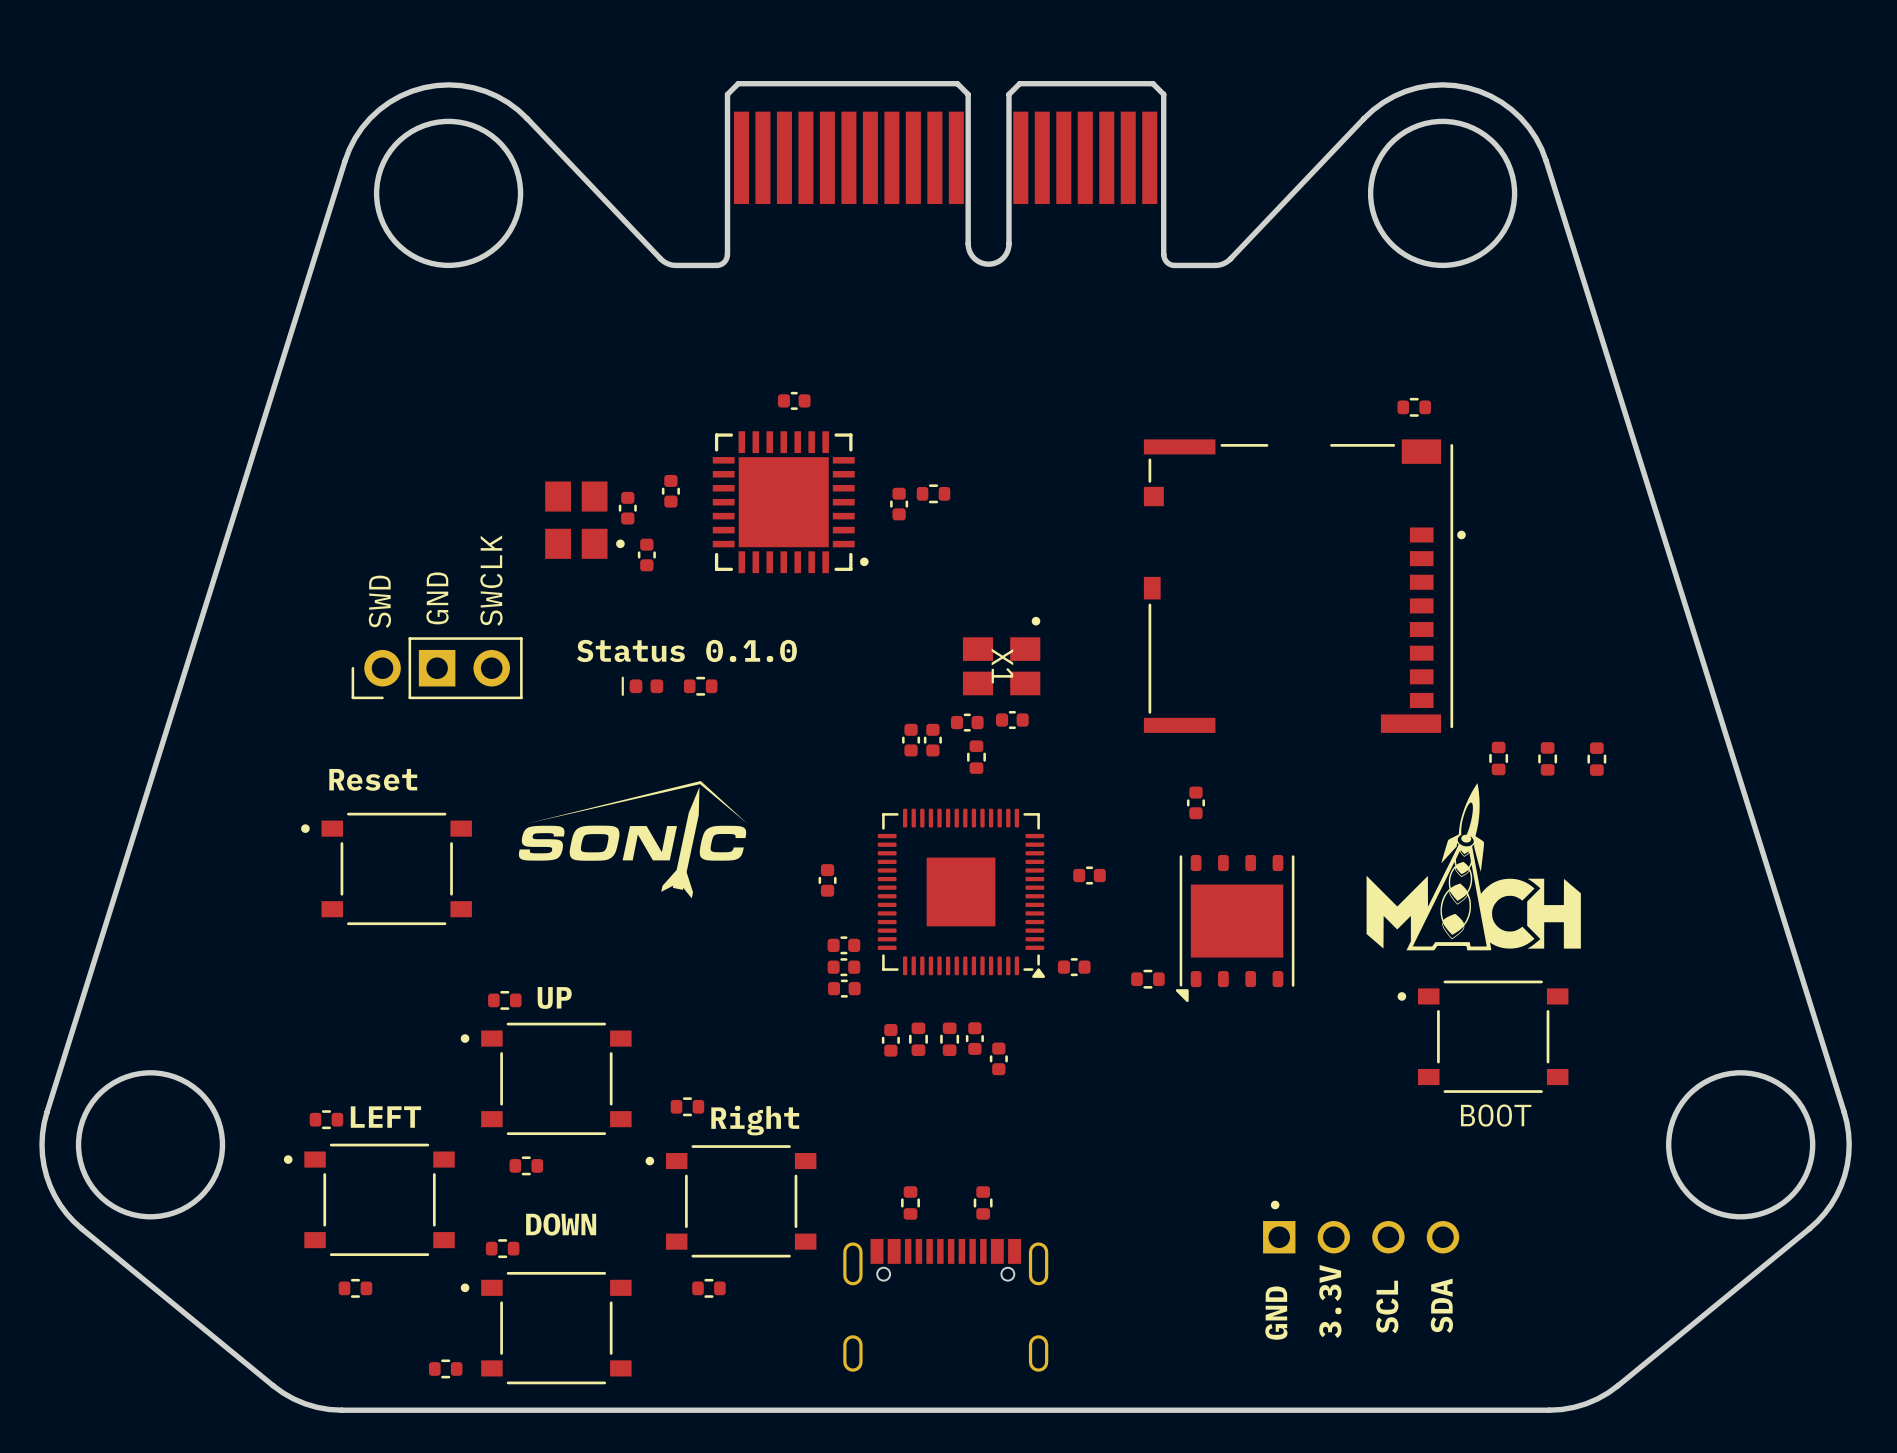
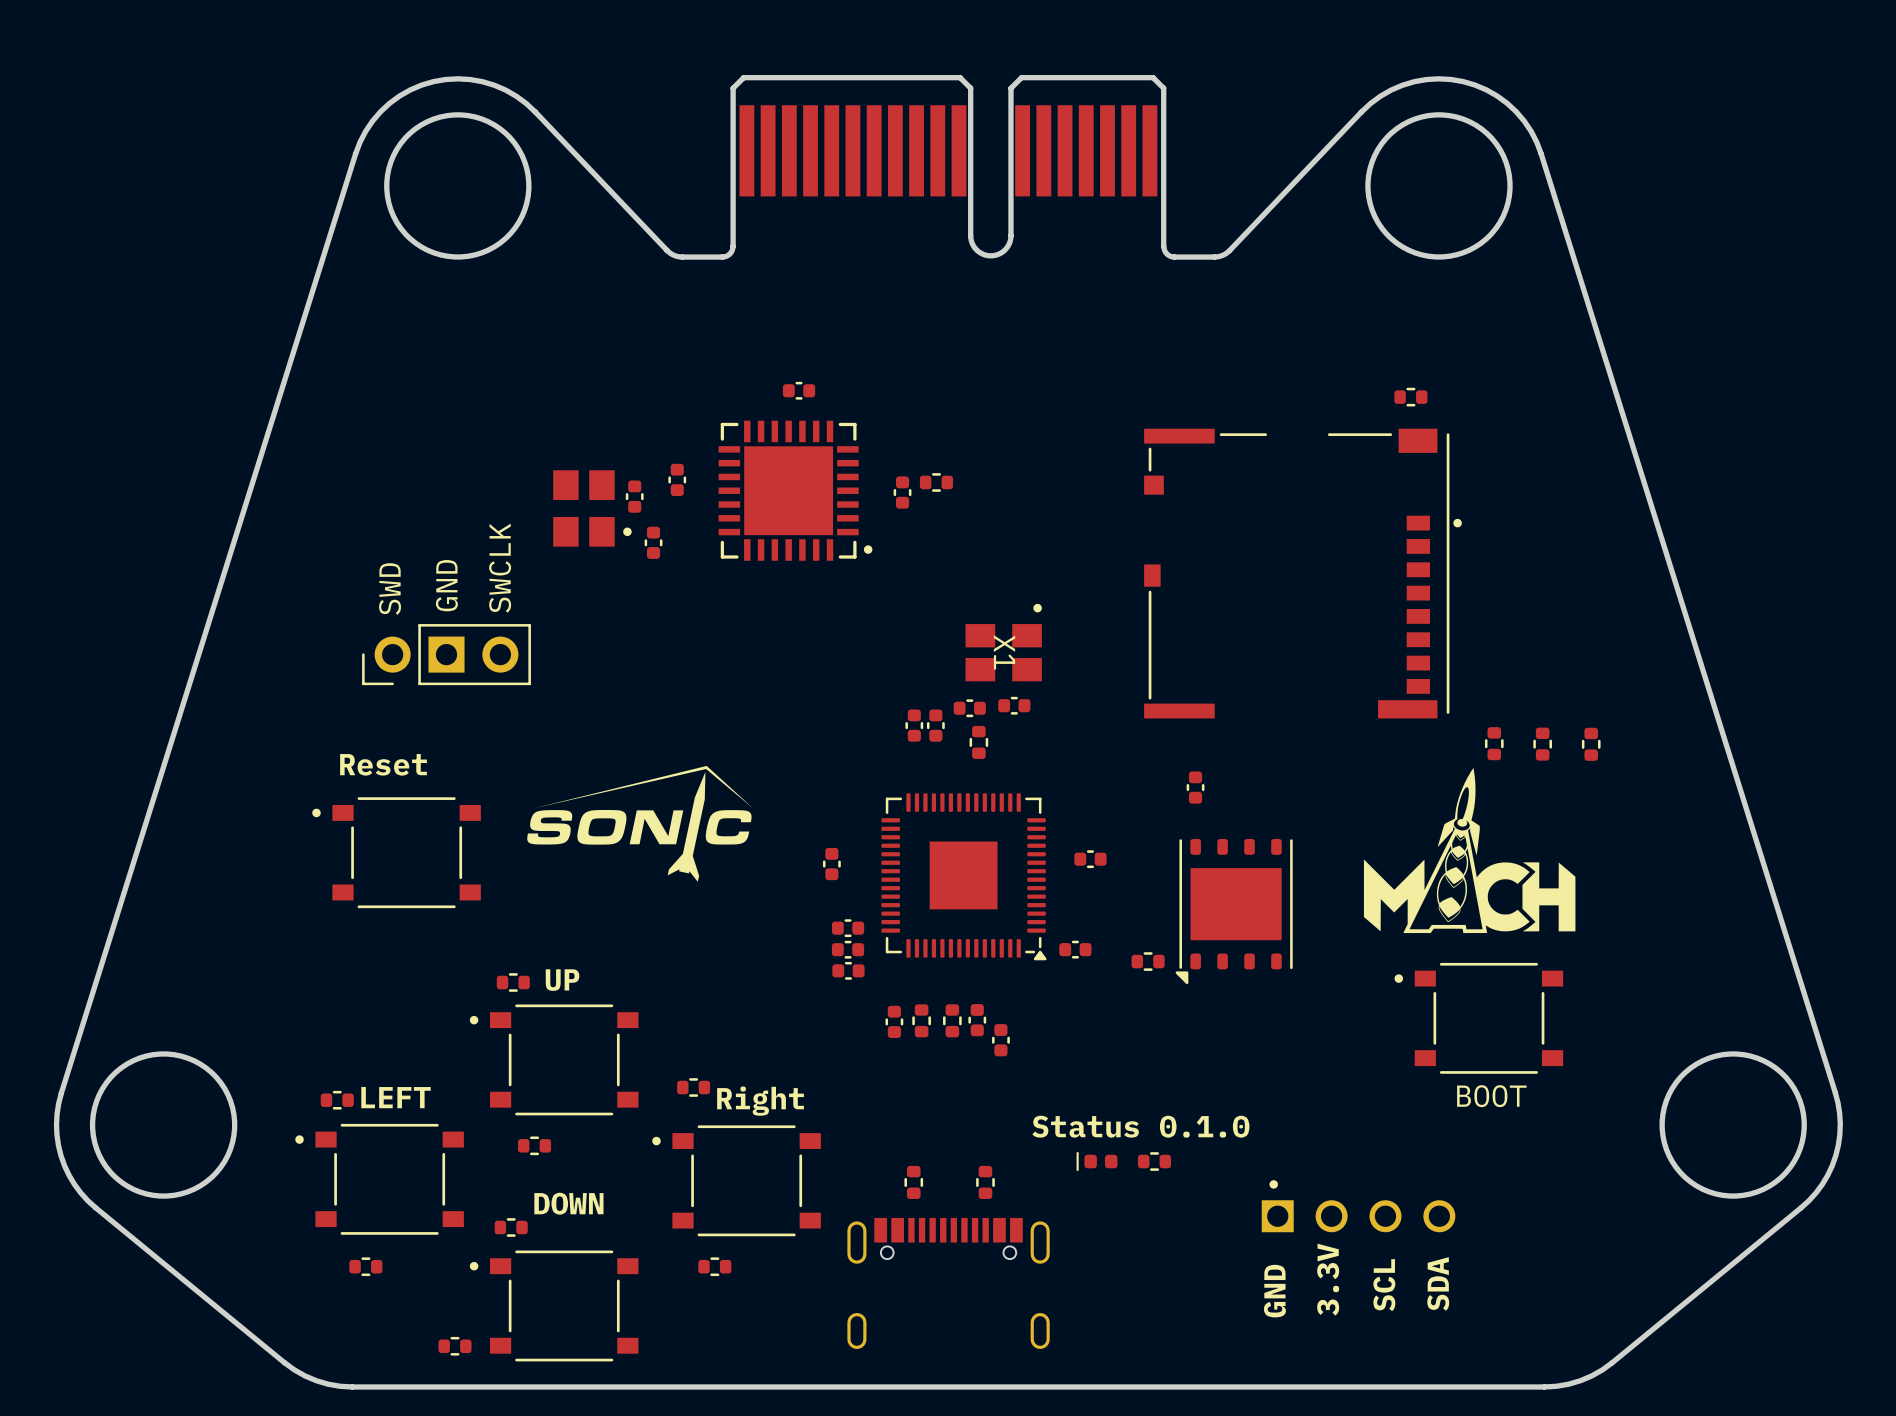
text: Status 0.1.0 (686, 650) -> none
part: (642, 686) -> none
part: (700, 686) -> none
text: none -> Status 0.1.0 (1140, 1126)
part: none -> (1097, 1161)
part: none -> (1154, 1161)

